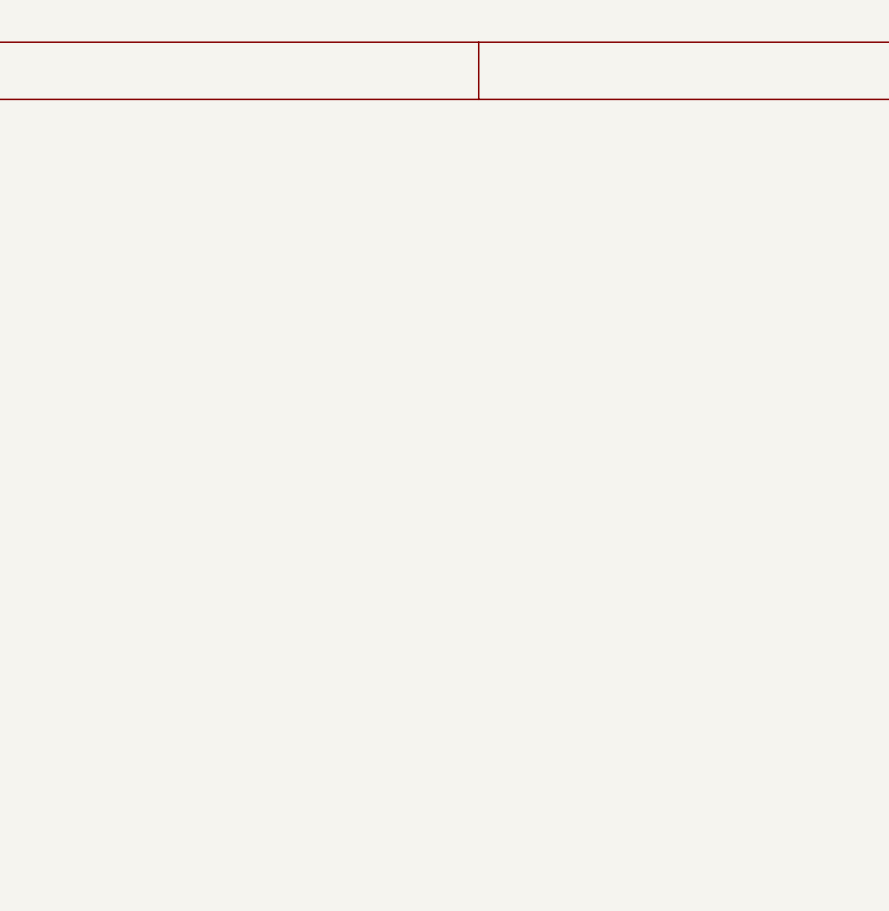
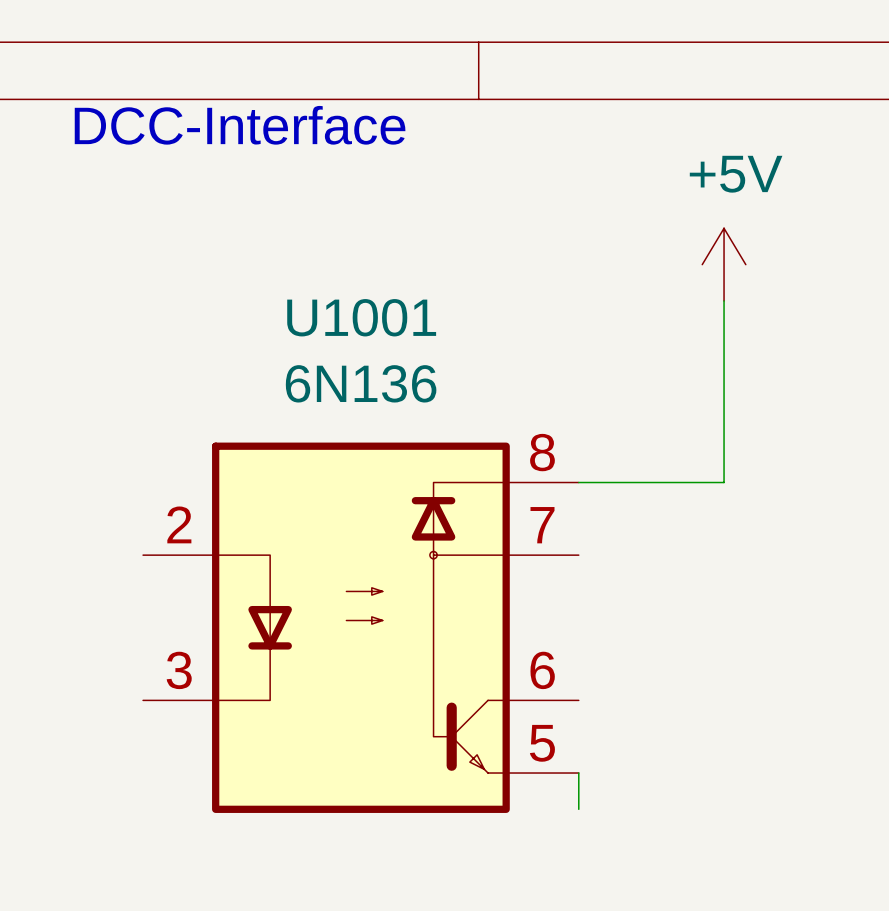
text: none -> DCC-Interface (240, 125)
power symbol: none -> +5V (724, 264)
wire: none -> (724, 300) (724, 482) (578, 482)
U1001: none -> 6N136 (360, 627)
wire: none -> (578, 773) (578, 809)

